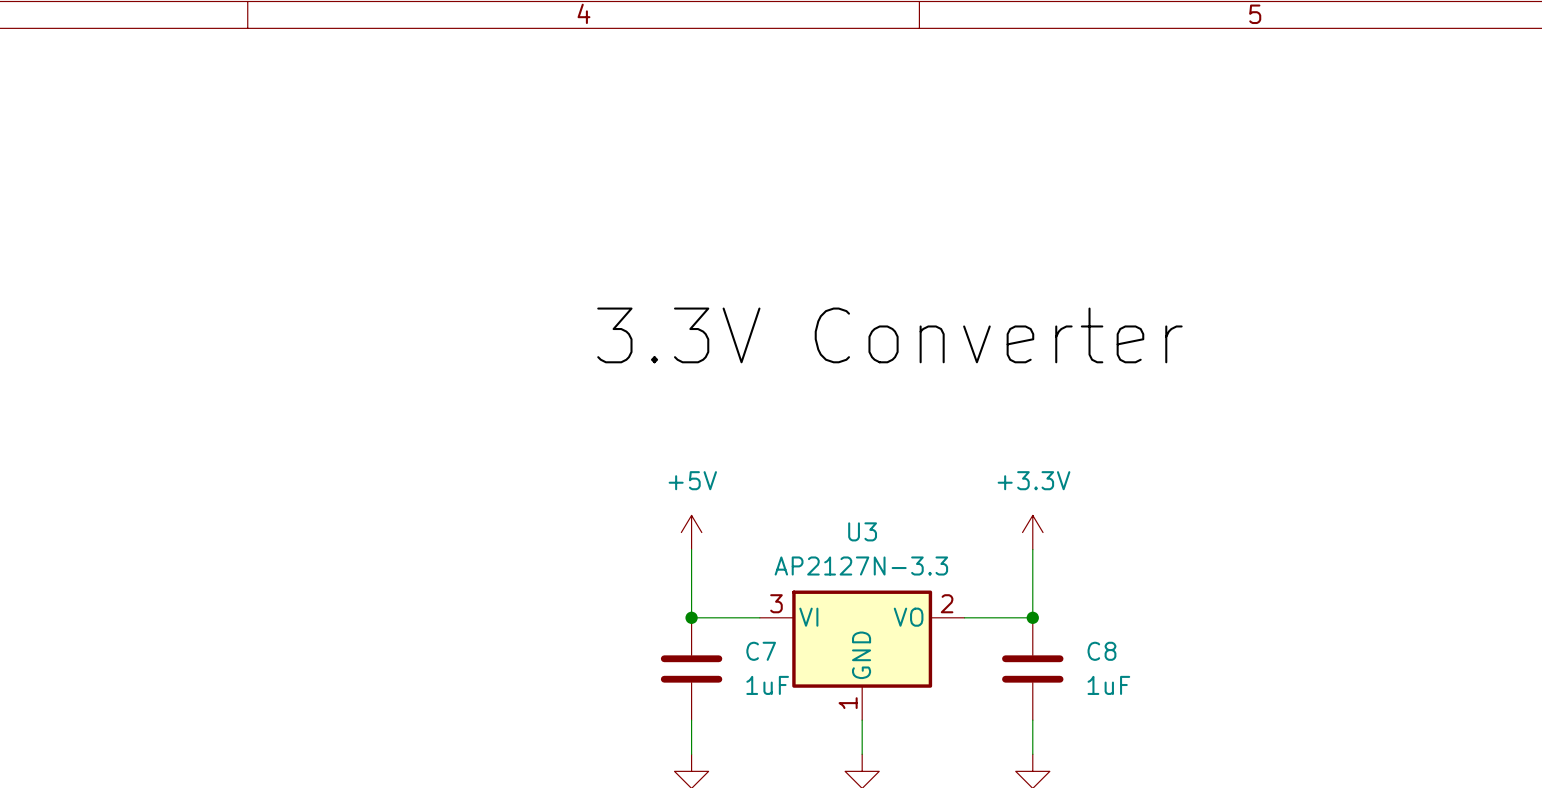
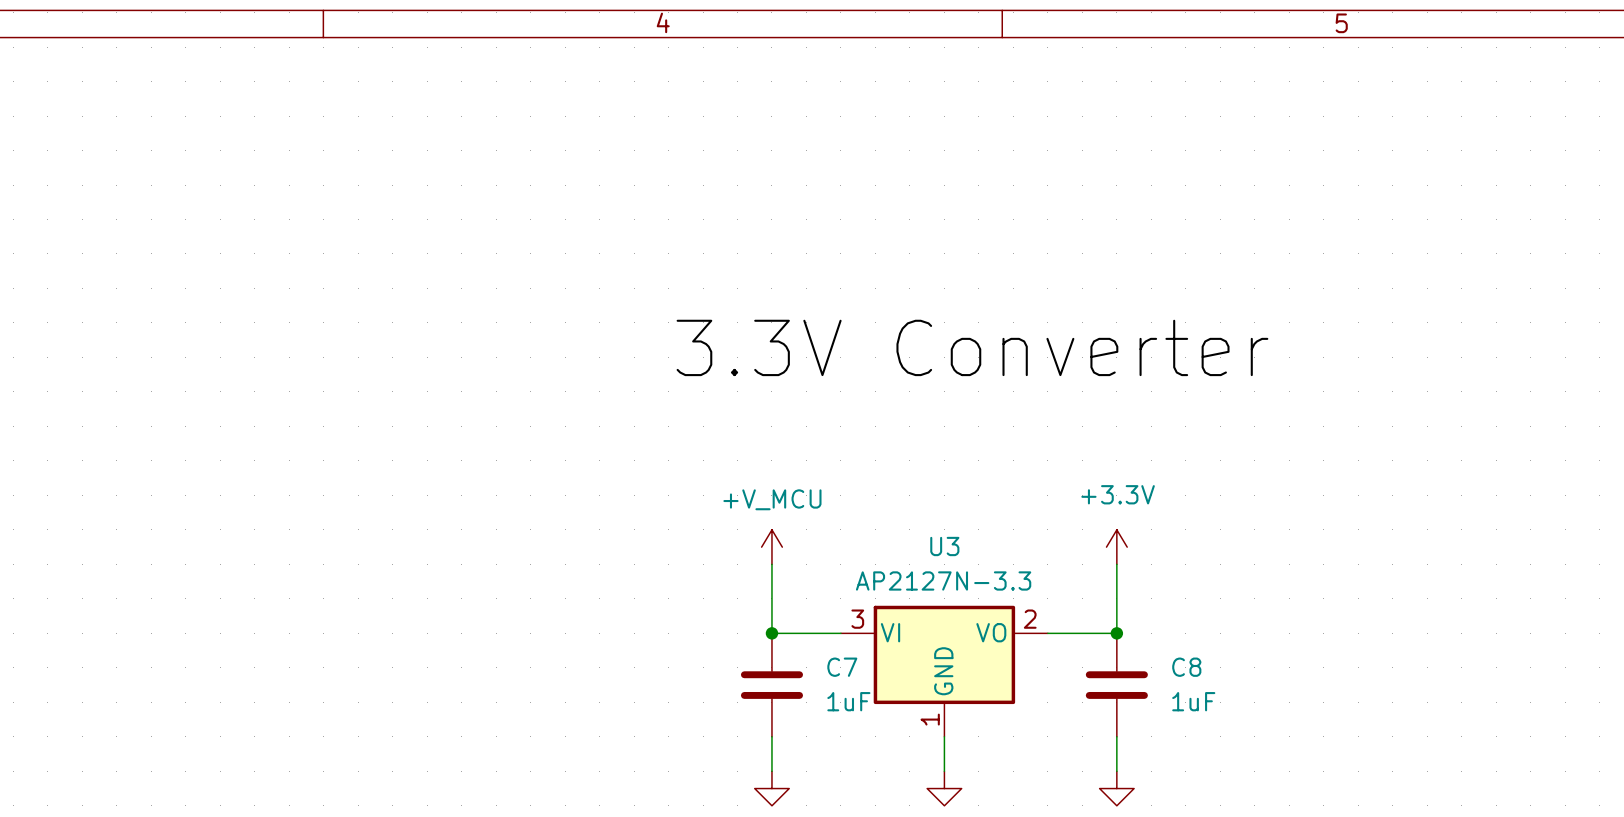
power symbol: +5V (691, 532) -> +V_MCU (771, 547)

